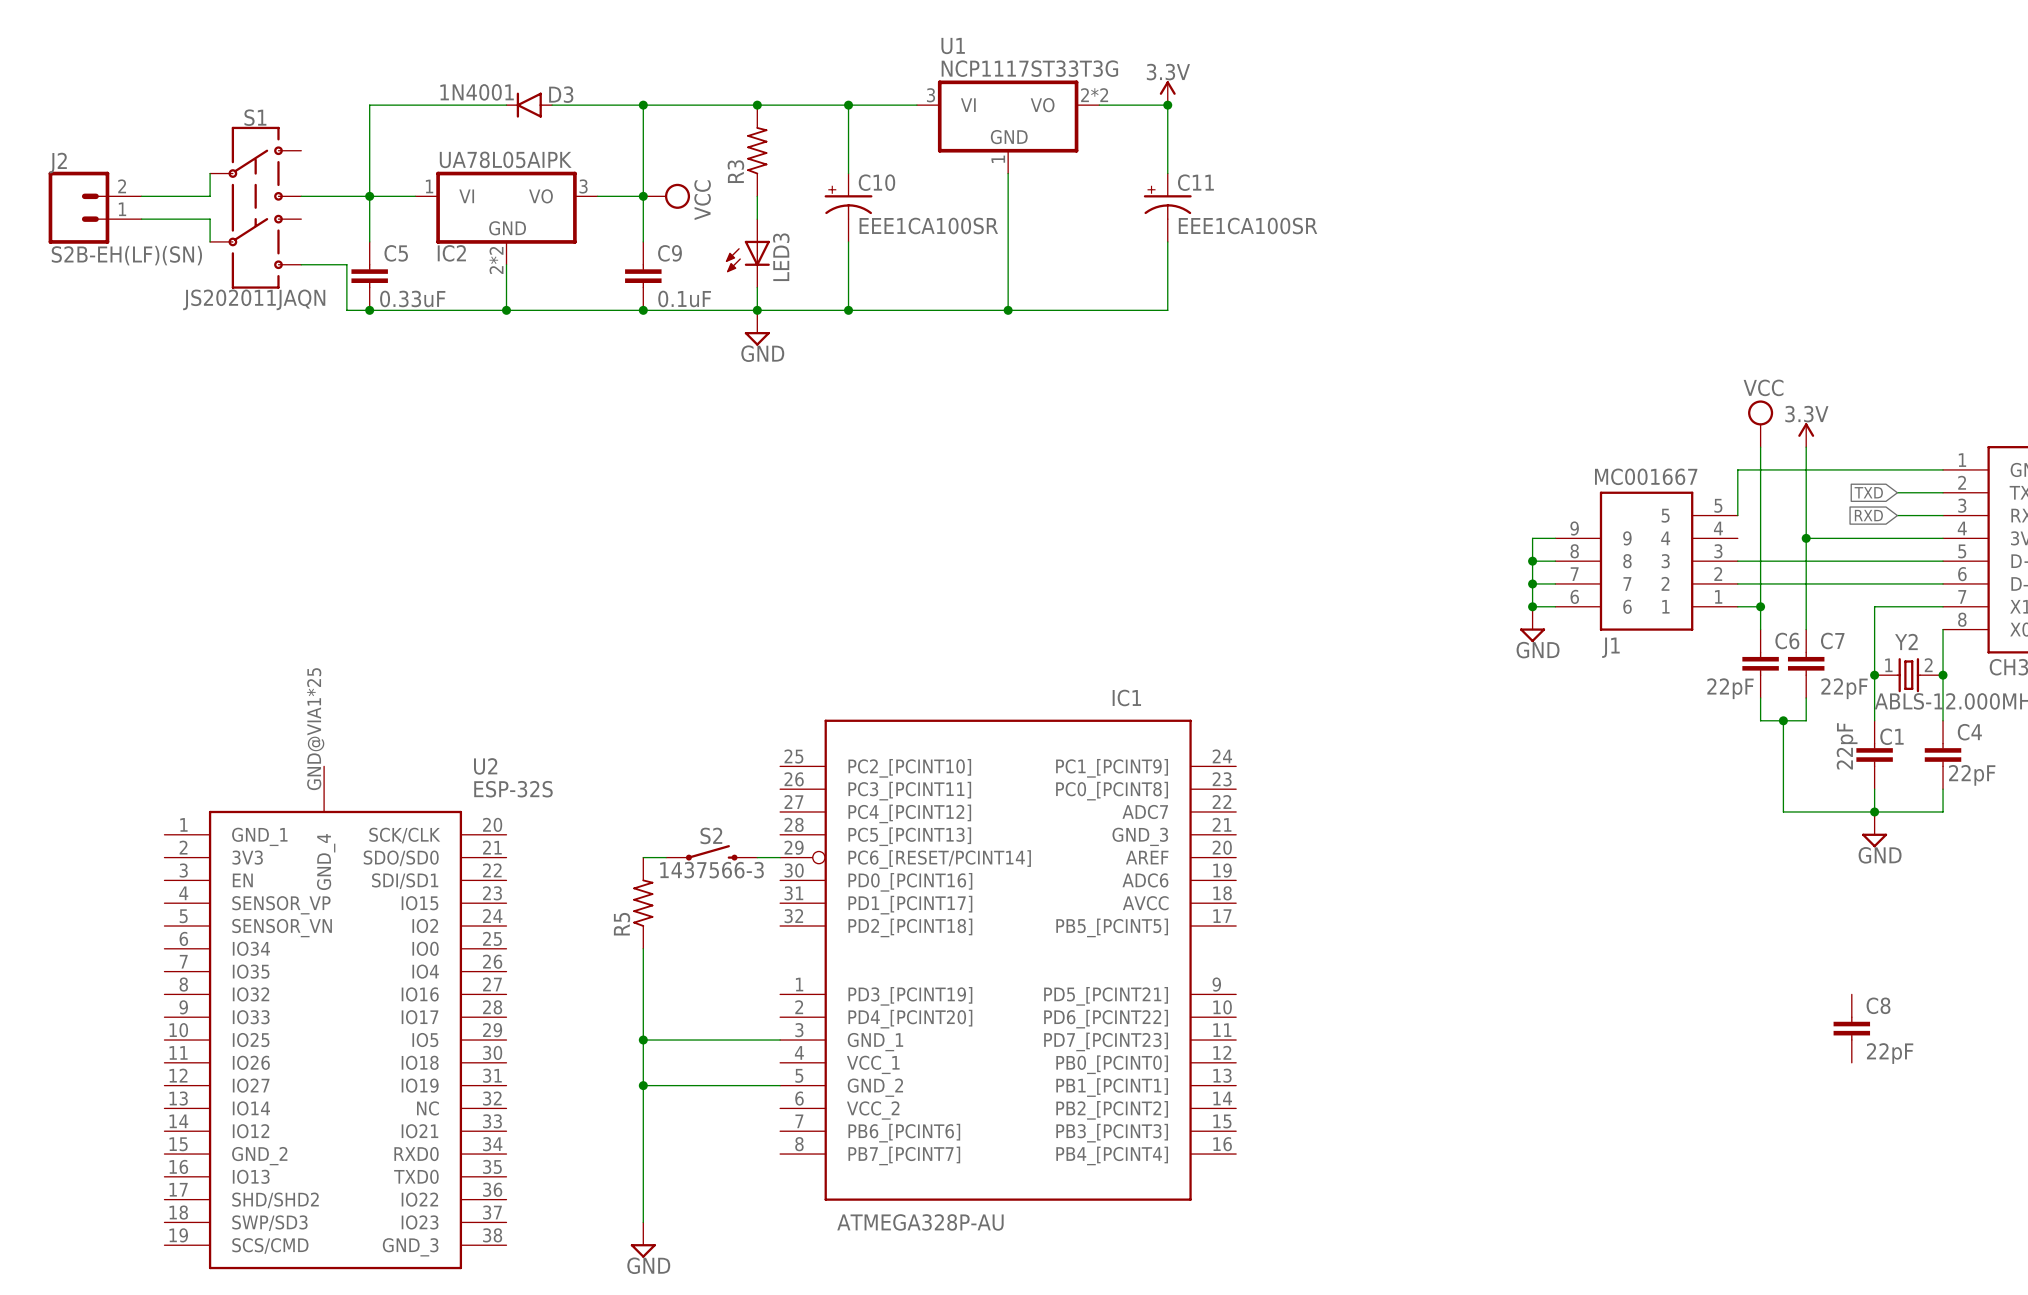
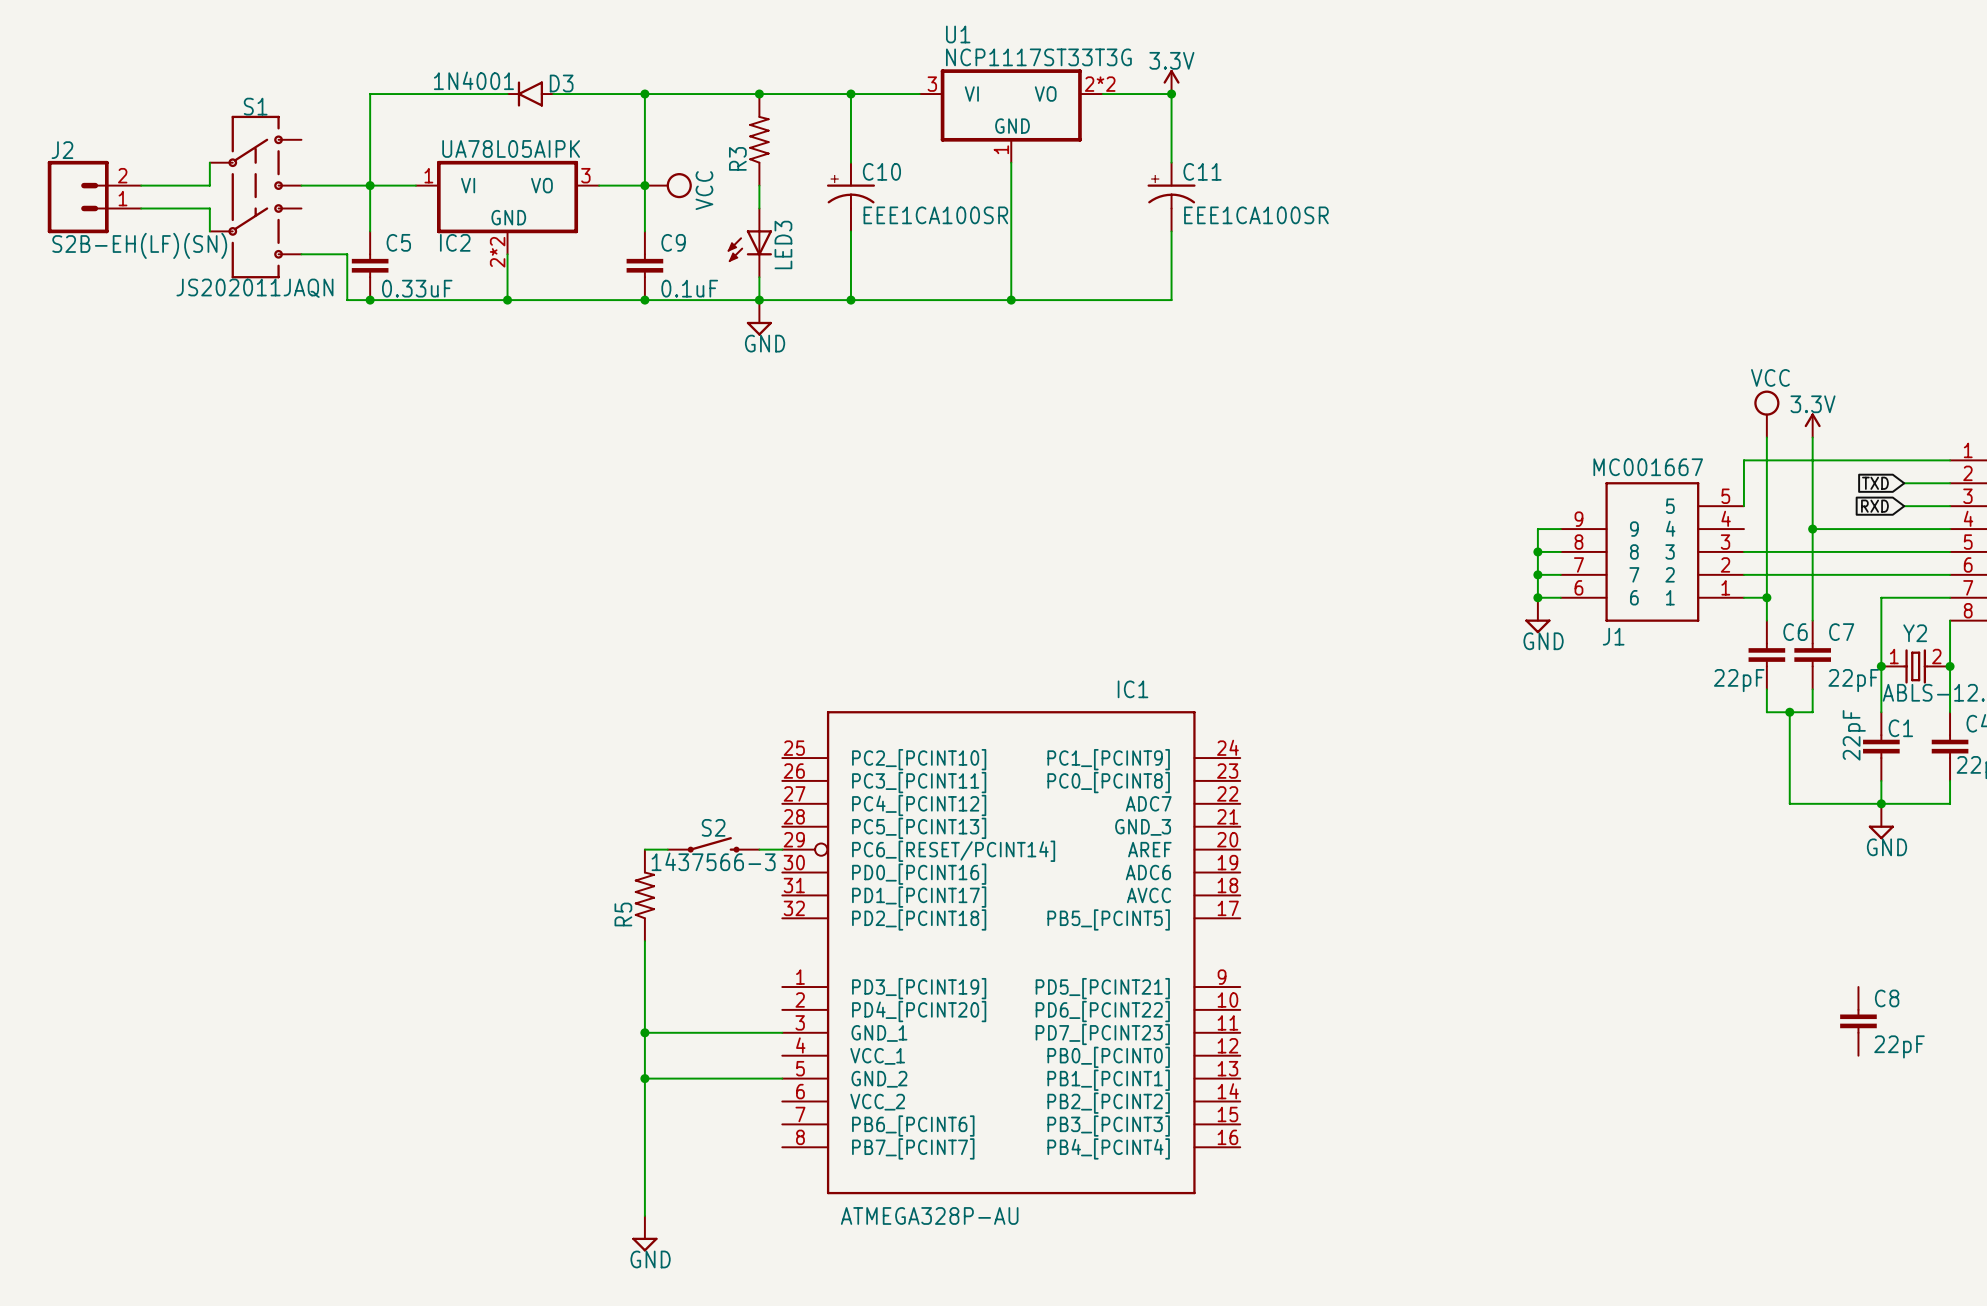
U2: ESP-32S (335, 1017) -> none

